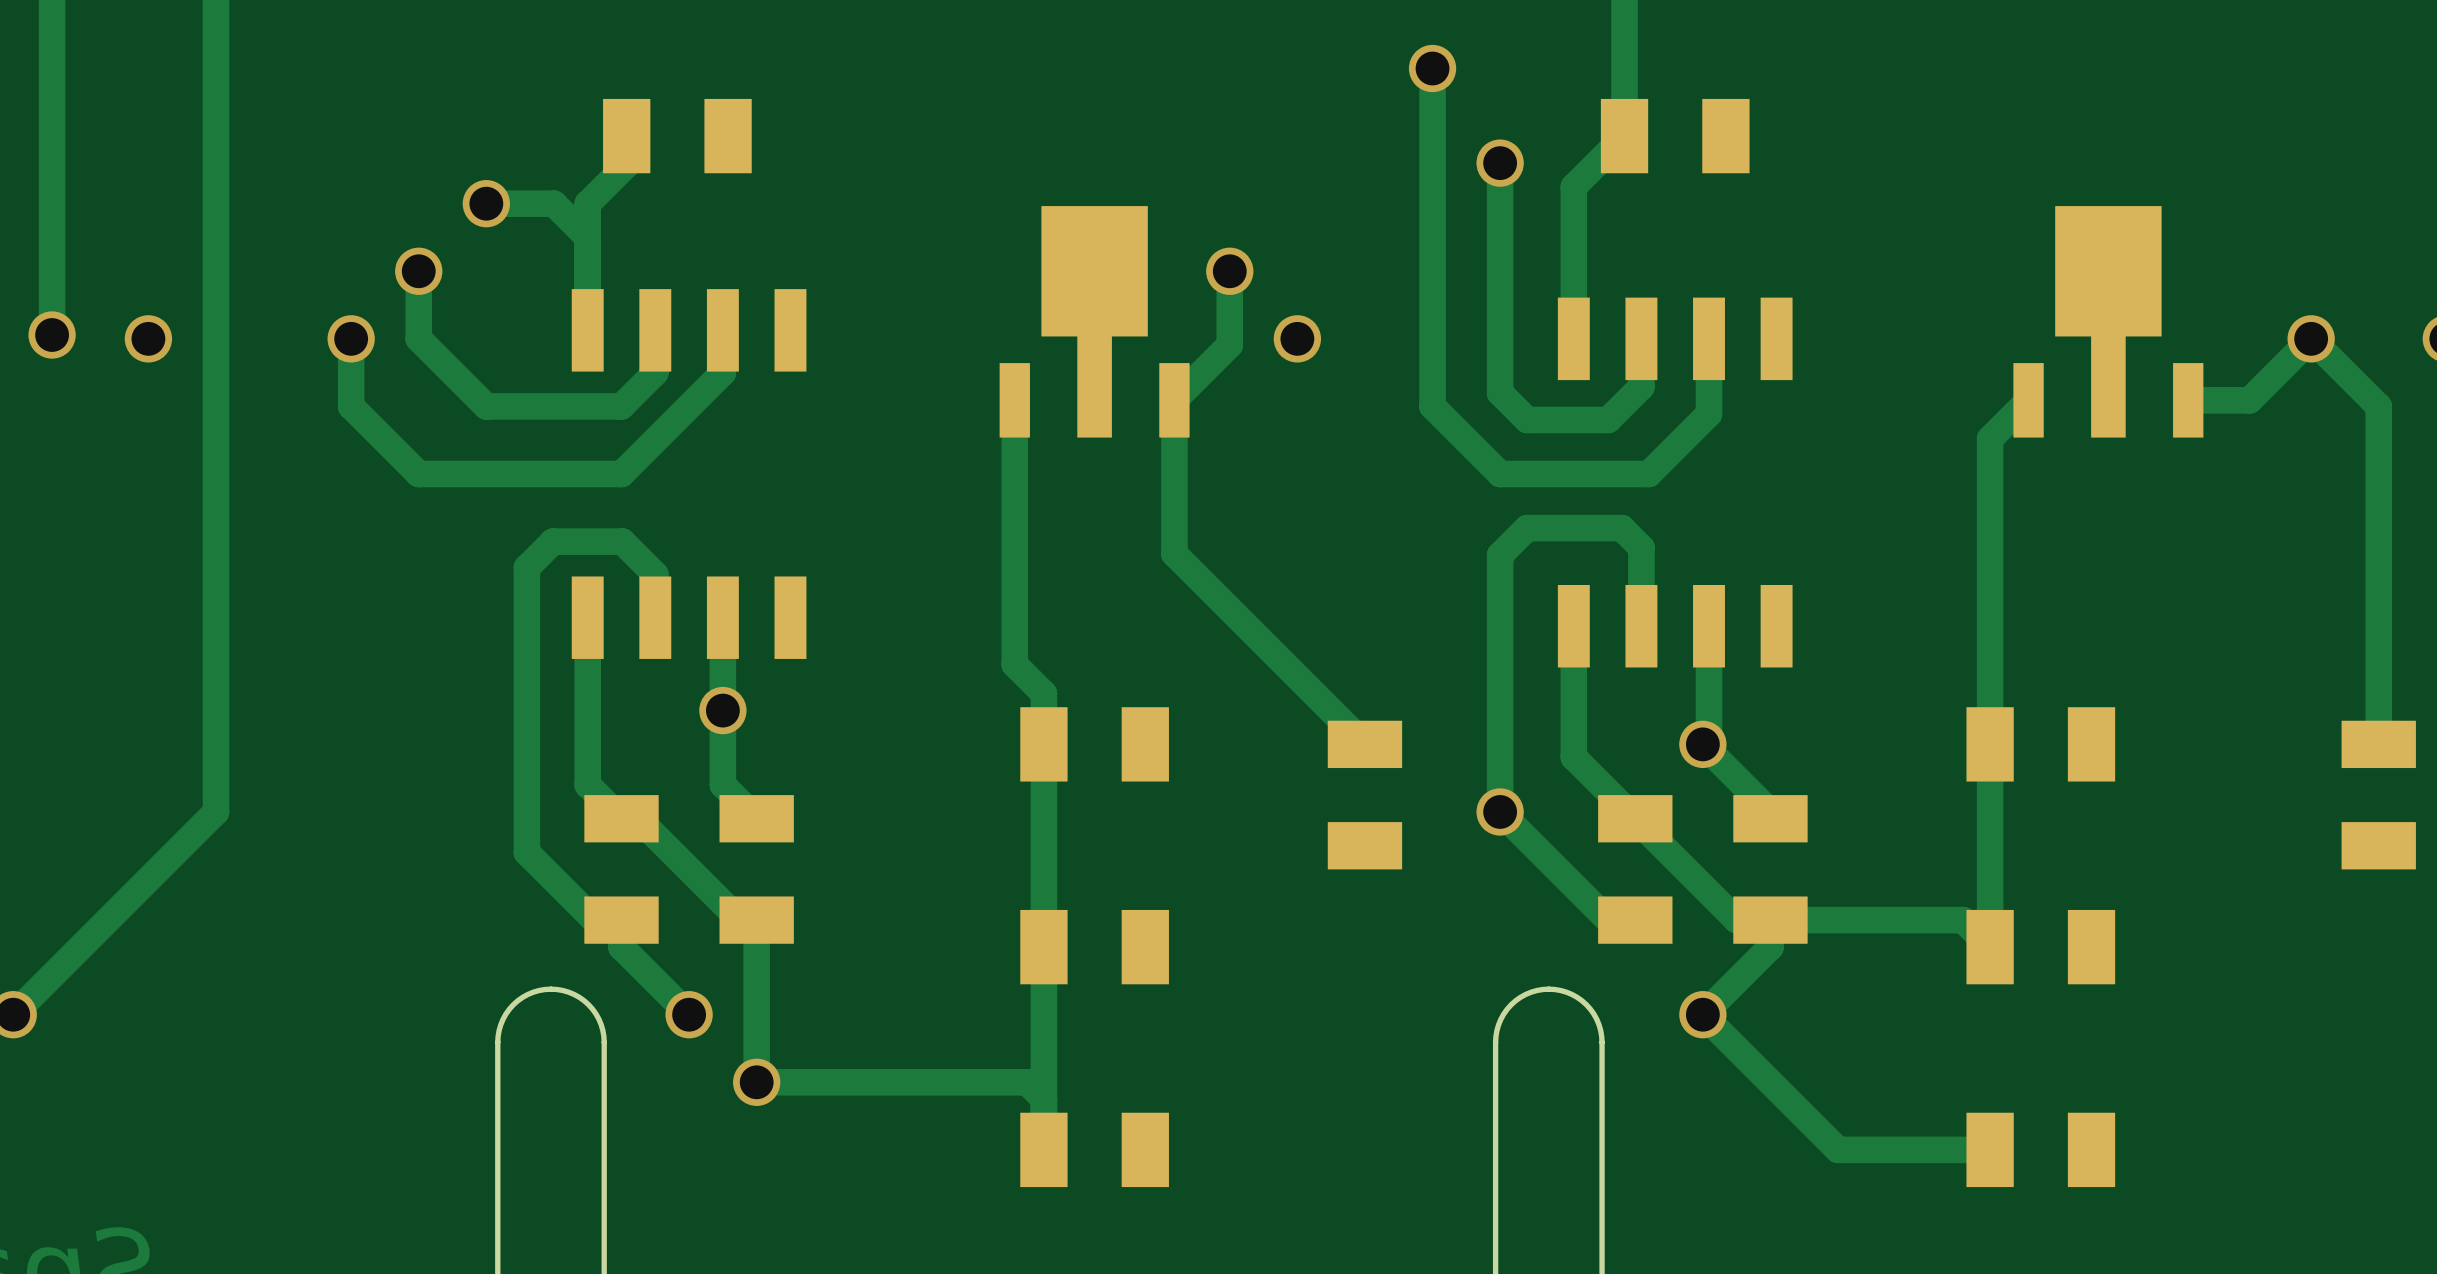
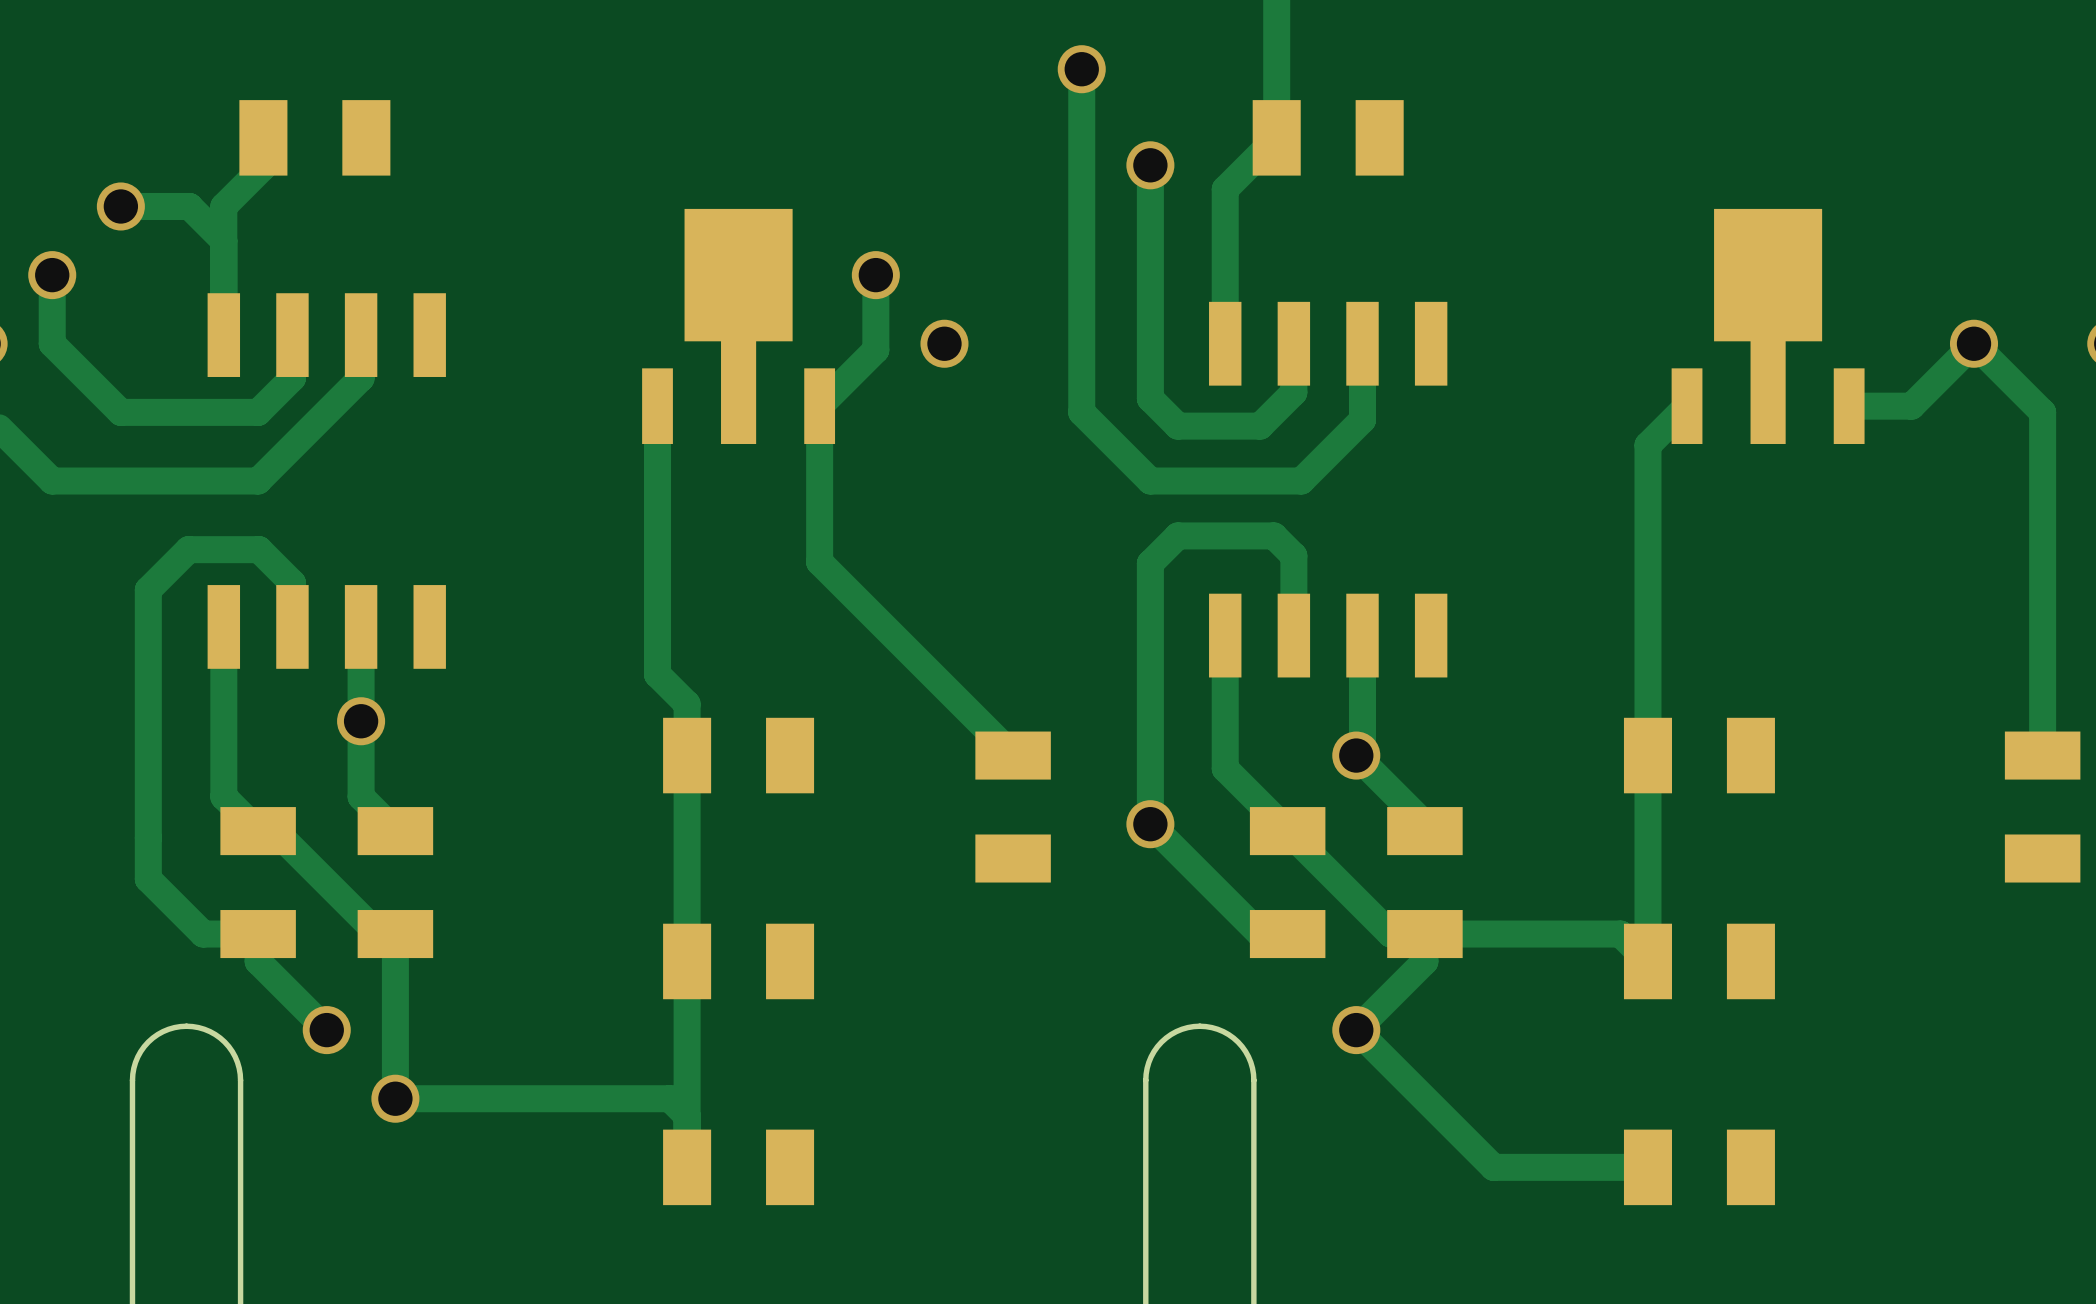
track: (526, 567) (526, 852) (594, 920) -> (162, 576) (148, 589) (148, 879) (203, 934) (230, 934)
board edge: (604, 1064) (602, 1030) (592, 1009) (574, 994) (551, 989) (527, 994) (509, 1009) (499, 1030) (497, 1064) -> (240, 1080) (237, 1062) (224, 1042) (209, 1031) (186, 1026) (168, 1029) (148, 1042) (135, 1062) (132, 1080)
board edge: (1602, 1064) (1600, 1030) (1590, 1009) (1571, 994) (1548, 989) (1525, 994) (1507, 1009) (1496, 1030) (1495, 1064) -> (1253, 1080) (1250, 1062) (1238, 1042) (1223, 1031) (1199, 1026) (1176, 1031) (1161, 1042) (1151, 1056) (1145, 1080)

